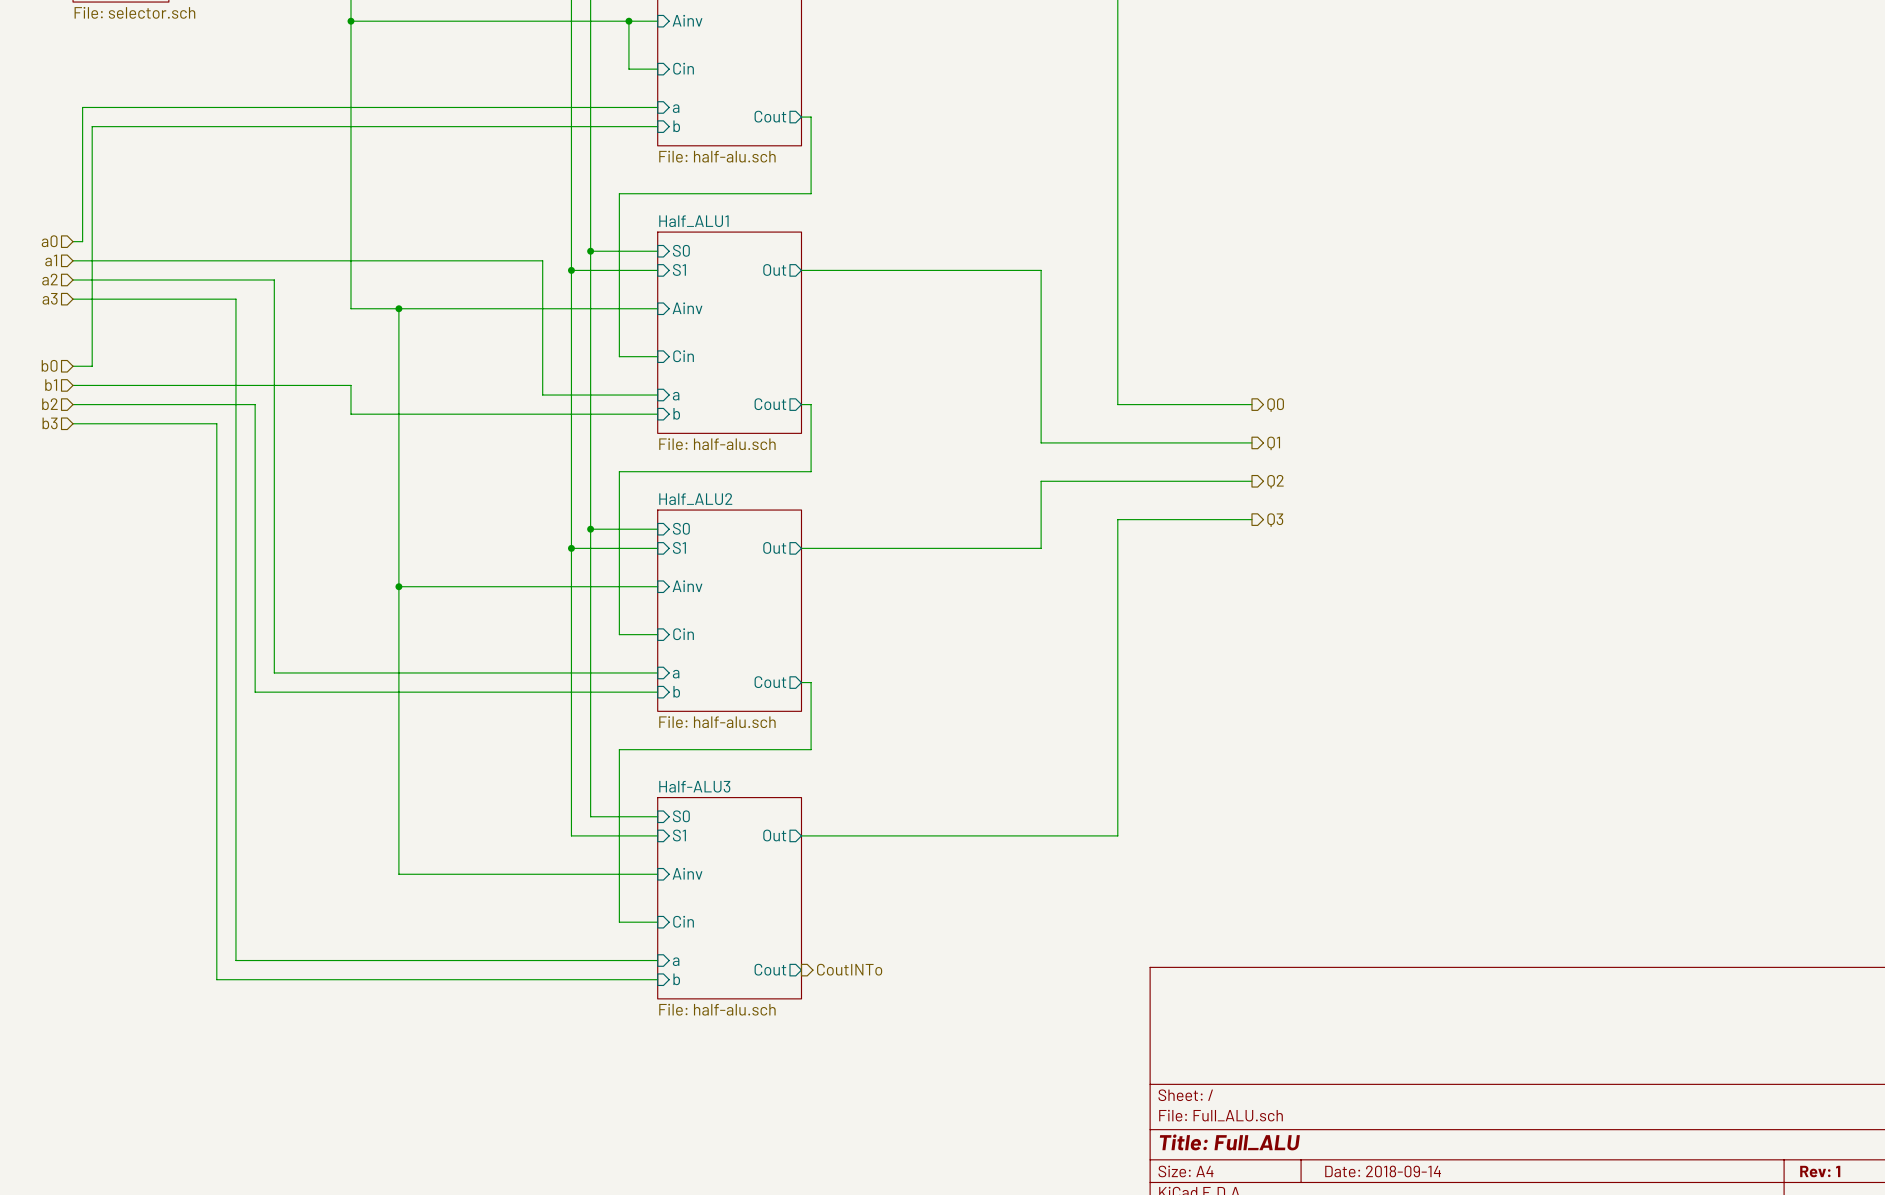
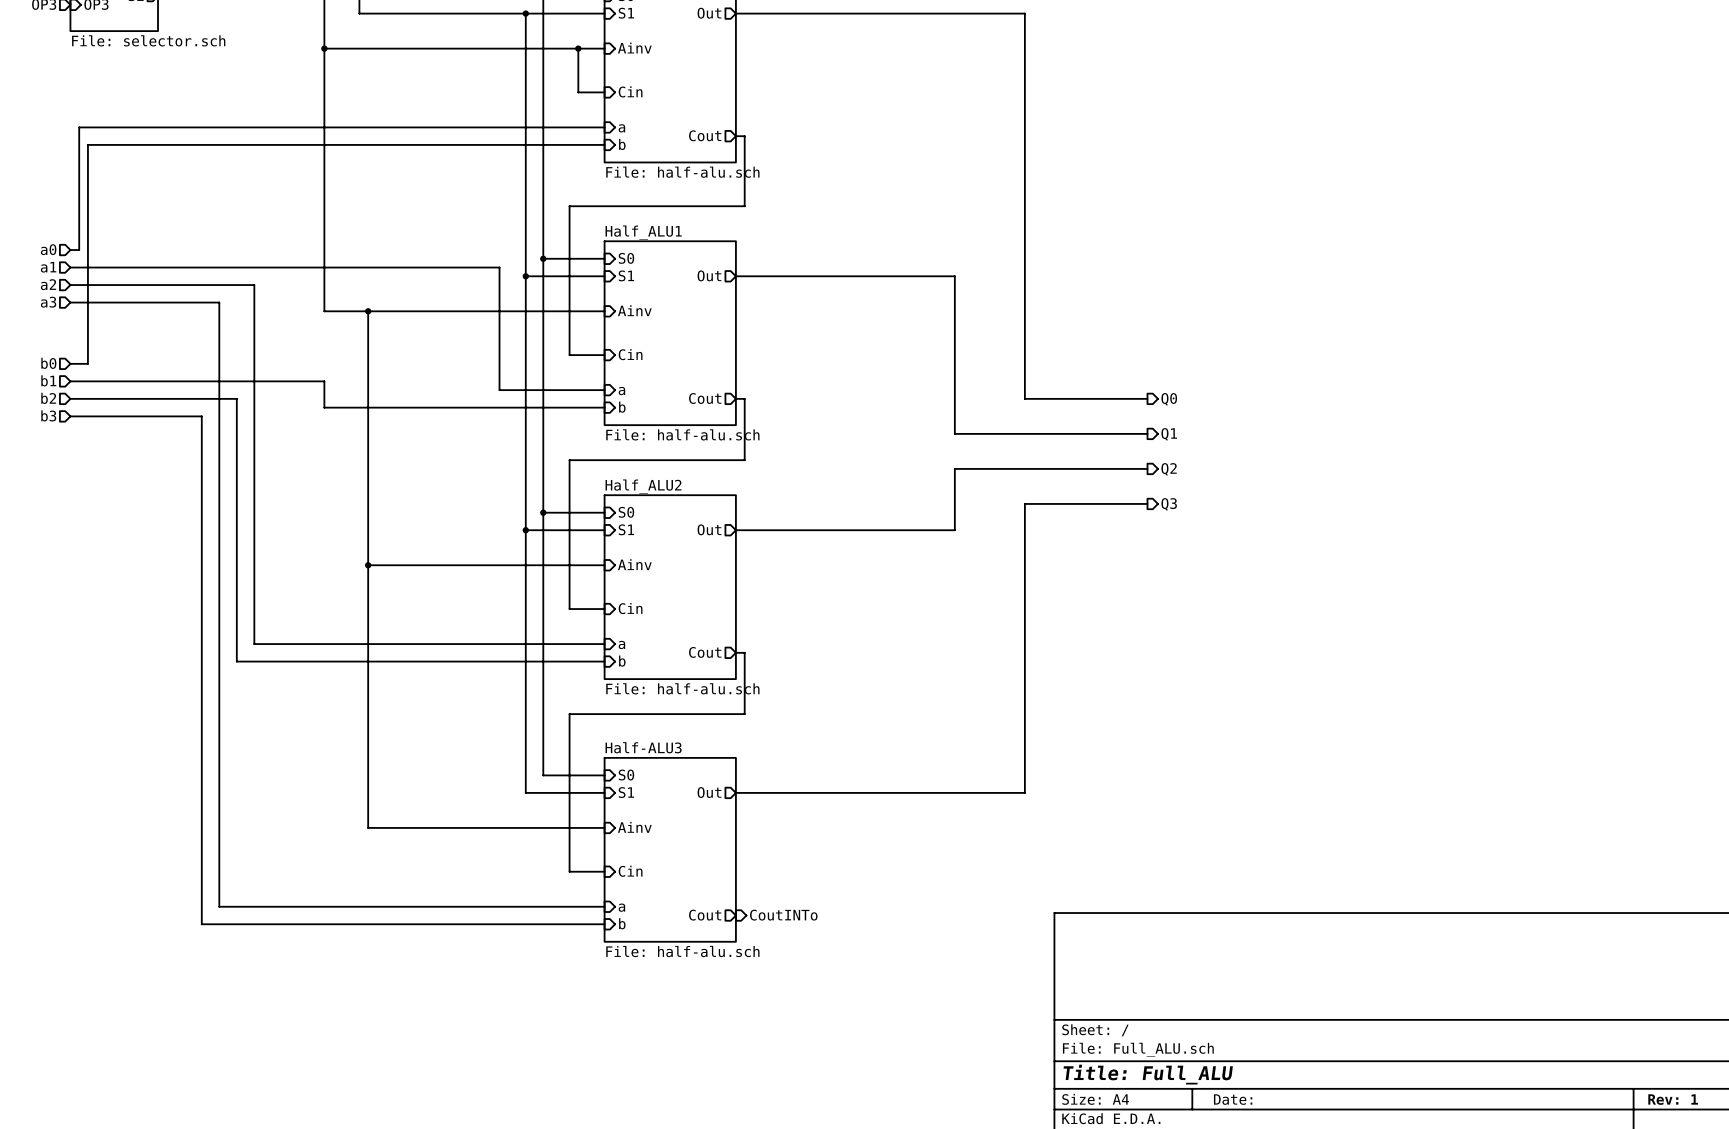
title block: Date: 2018-09-14 (1383, 1171) -> Date: (1233, 1099)

